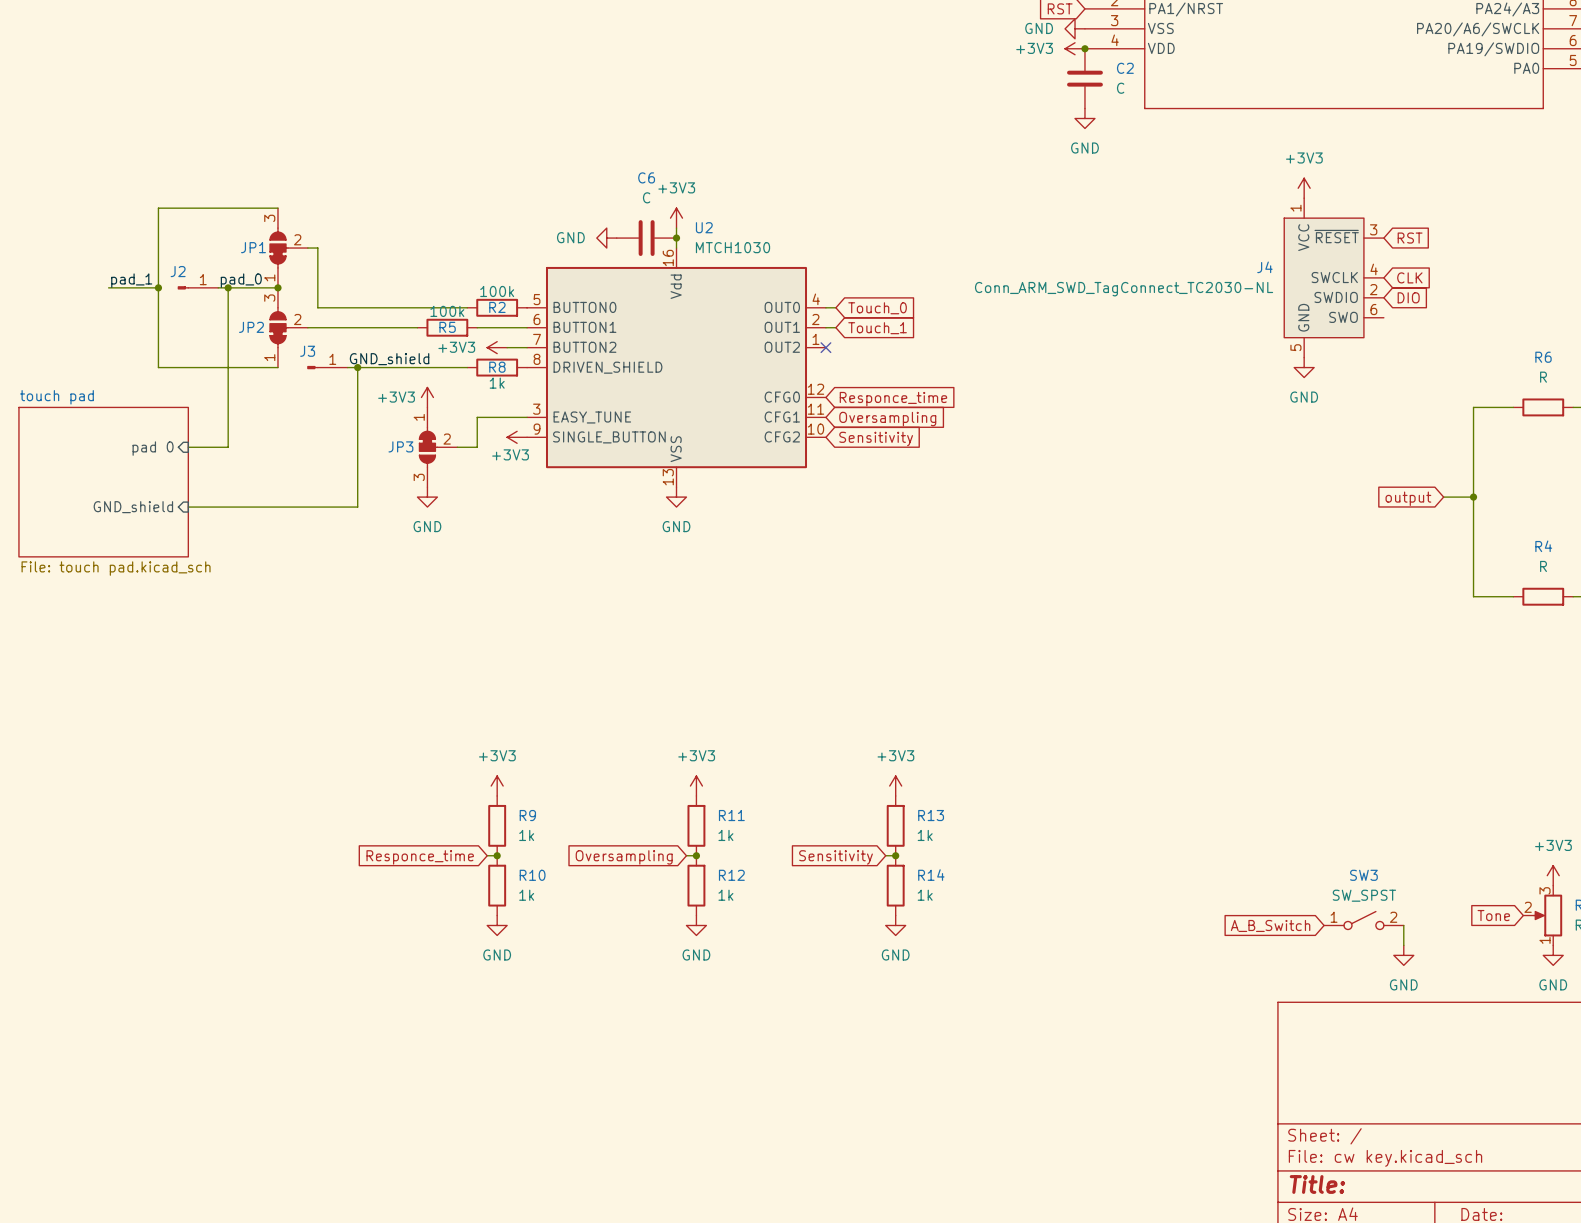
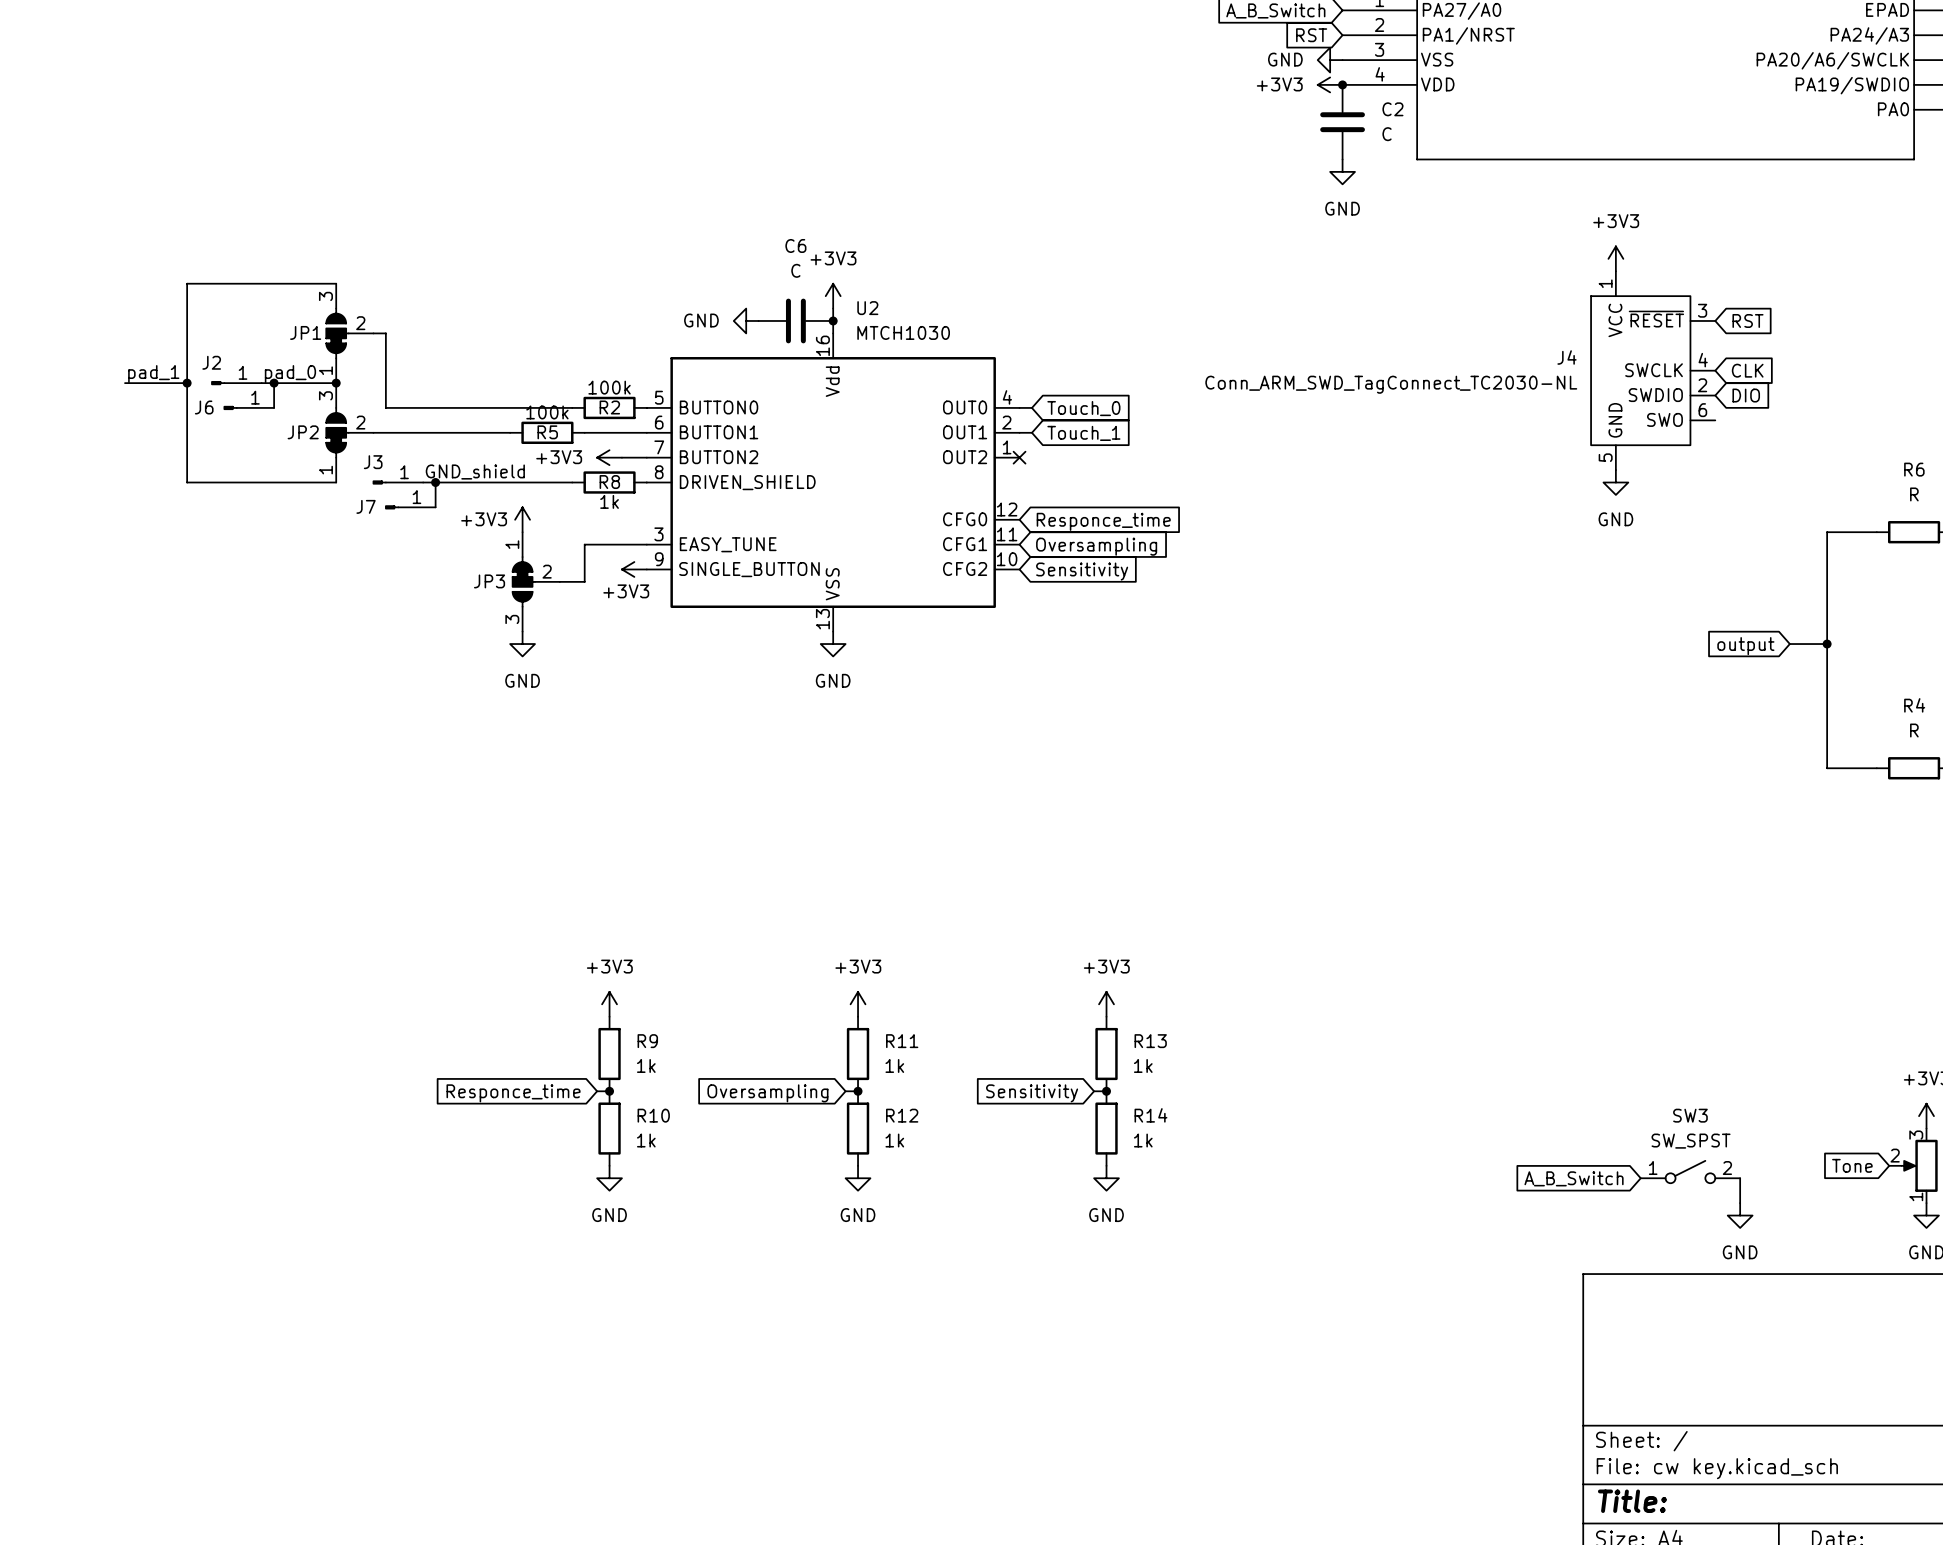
J6: none -> (248, 407)
wire: (228, 307) (228, 447) (188, 447) -> none
J7: none -> (410, 507)
wire: (357, 387) (357, 507) (188, 507) -> none
sheet pin: pad 0 (153, 448) -> none
sheet touch pad: File: touch pad.kicad_sch (103, 482) -> none
sheet pin: GND_shield (133, 507) -> none

